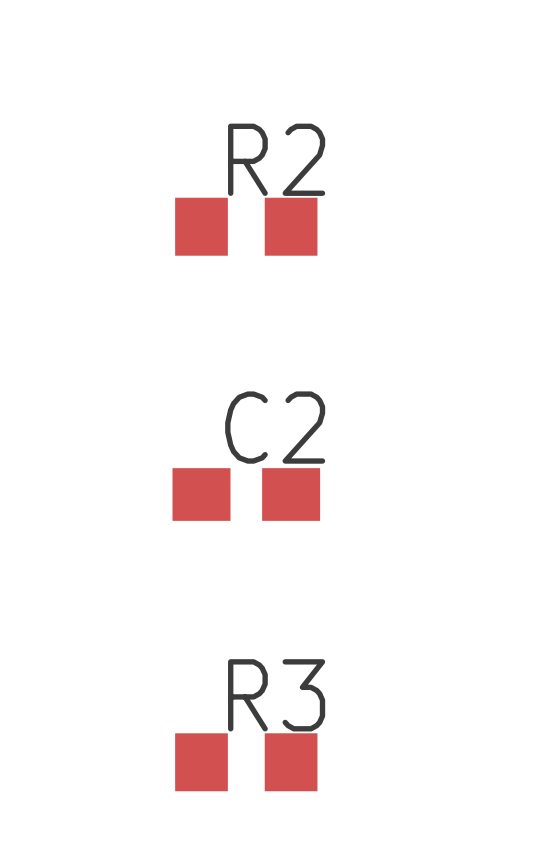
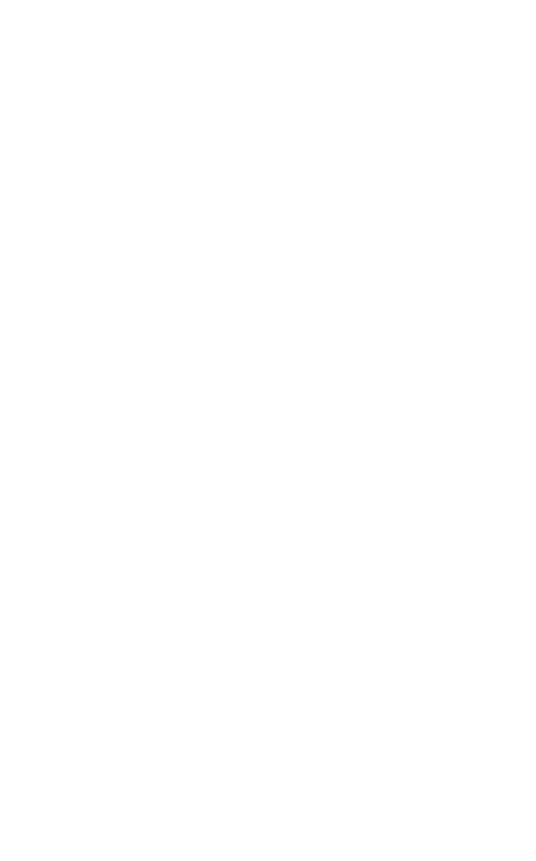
R2: (246, 226) -> none
C2: (246, 494) -> none
R3: (246, 762) -> none

